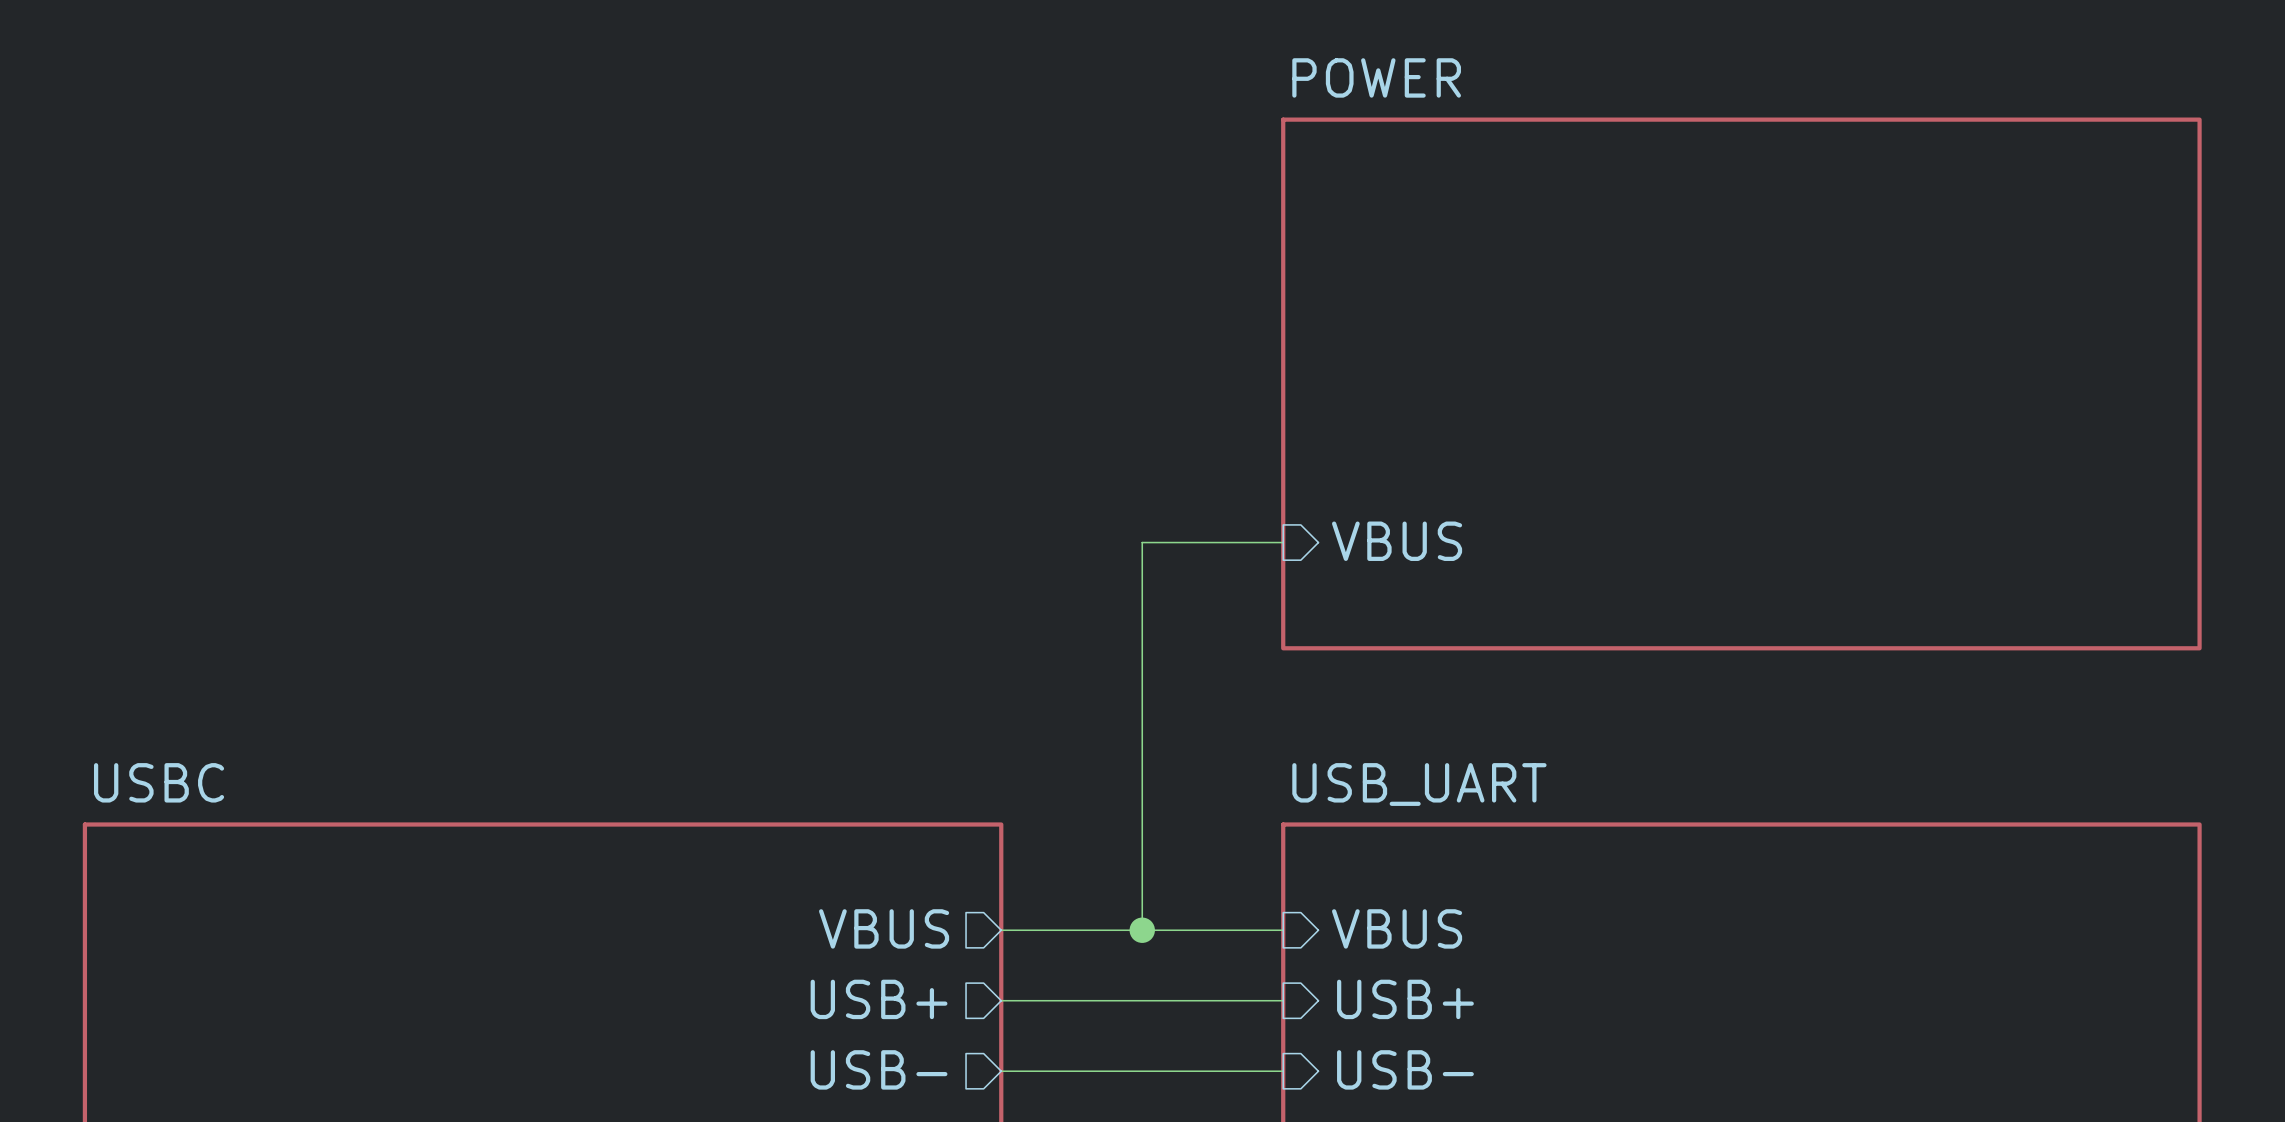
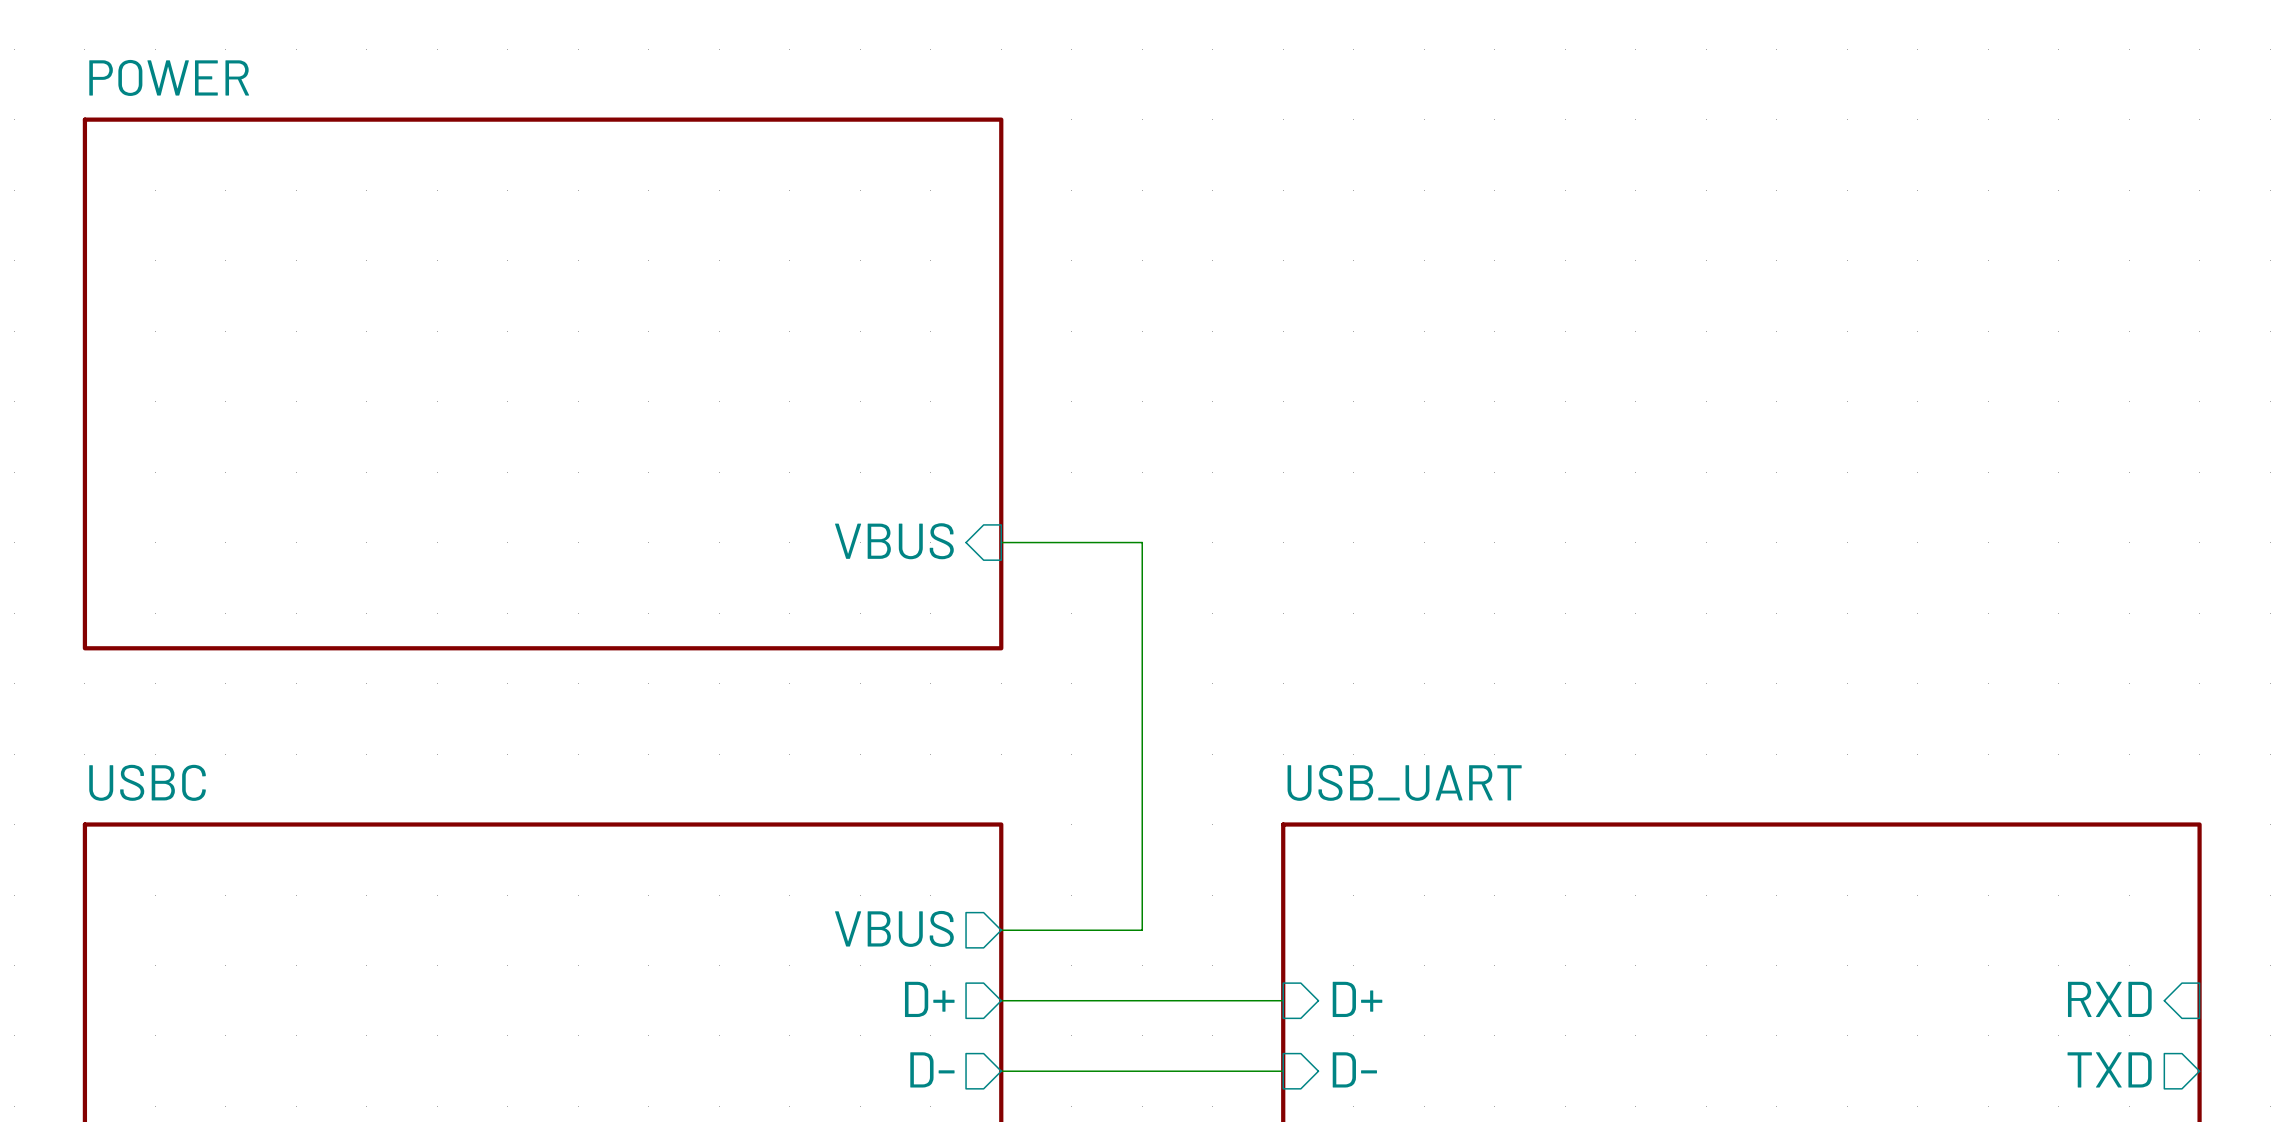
sheet POWER: none -> (543, 383)
sheet POWER: (1741, 383) -> none
sheet pin: none -> VBUS (894, 541)
sheet pin: VBUS (1397, 541) -> none
wire: (1142, 542) (1283, 542) -> (1142, 542) (1001, 542)
sheet pin: VBUS (1397, 928) -> none
wire: (1142, 930) (1283, 930) -> none
junction: (1142, 930) -> none
sheet pin: USB+ (879, 999) -> D+ (929, 999)
sheet pin: USB+ (1405, 999) -> D+ (1357, 999)
sheet pin: none -> RXD (2109, 999)
sheet pin: USB- (879, 1069) -> D- (932, 1069)
sheet pin: USB- (1405, 1069) -> D- (1354, 1069)
sheet pin: none -> TXD (2109, 1069)

